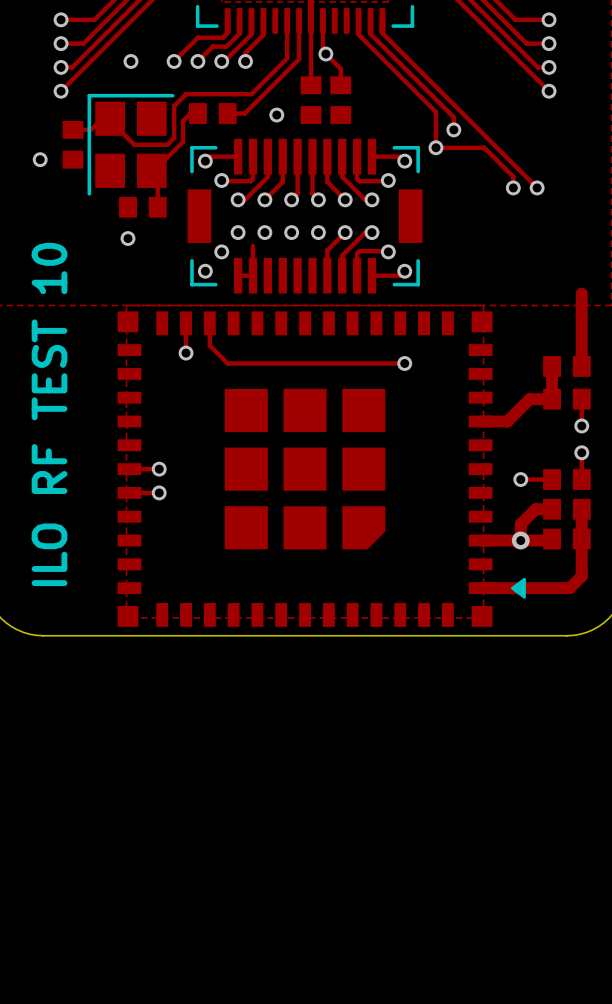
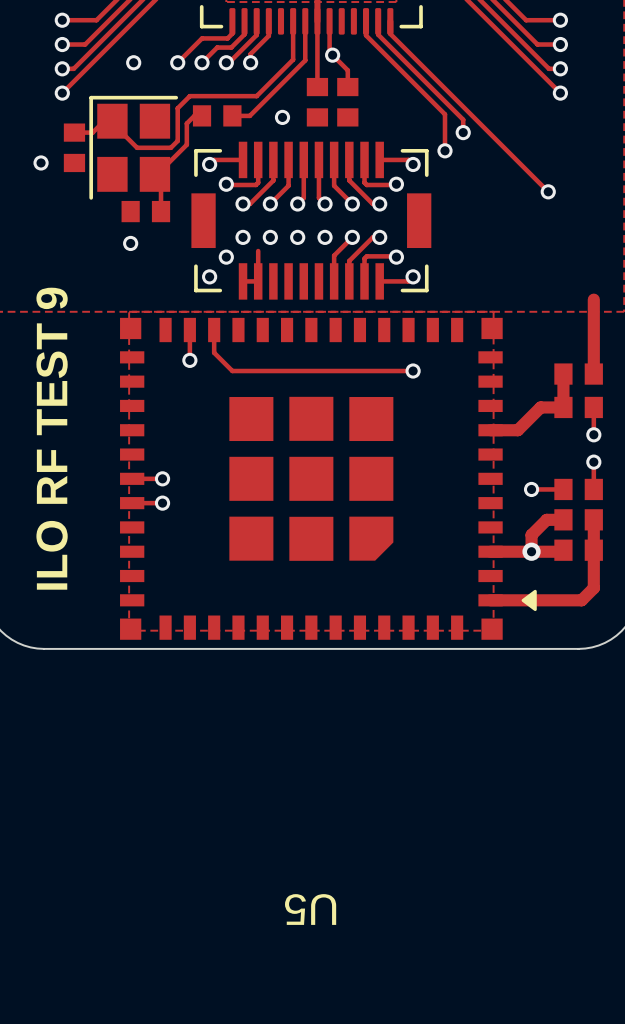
track: (435, 147) (484, 147) (513, 176) (513, 187) -> none
via: (513, 187) -> none
text: ILO RF TEST 10 (49, 414) -> ILO RF TEST 9 (52, 438)
U5 name: none -> U5 (310, 909)

